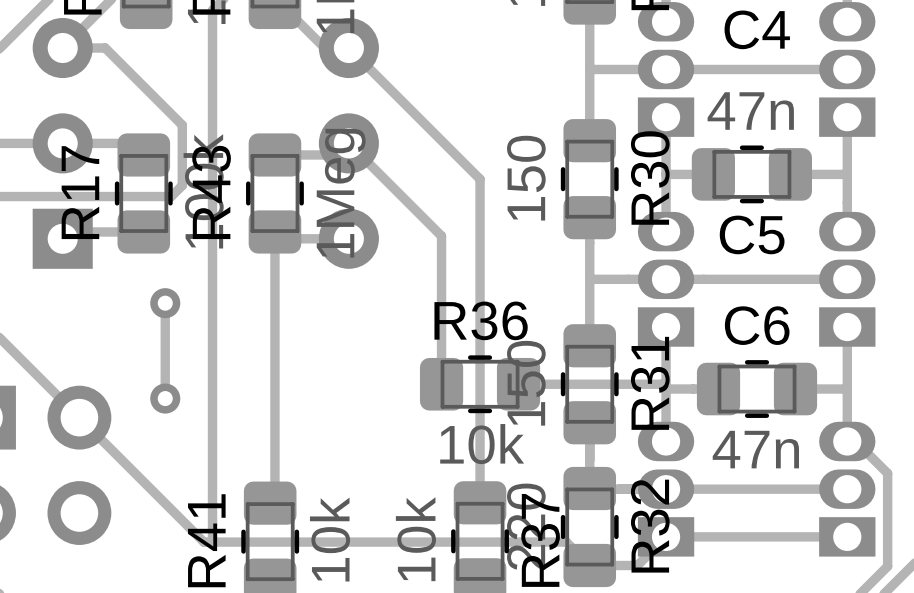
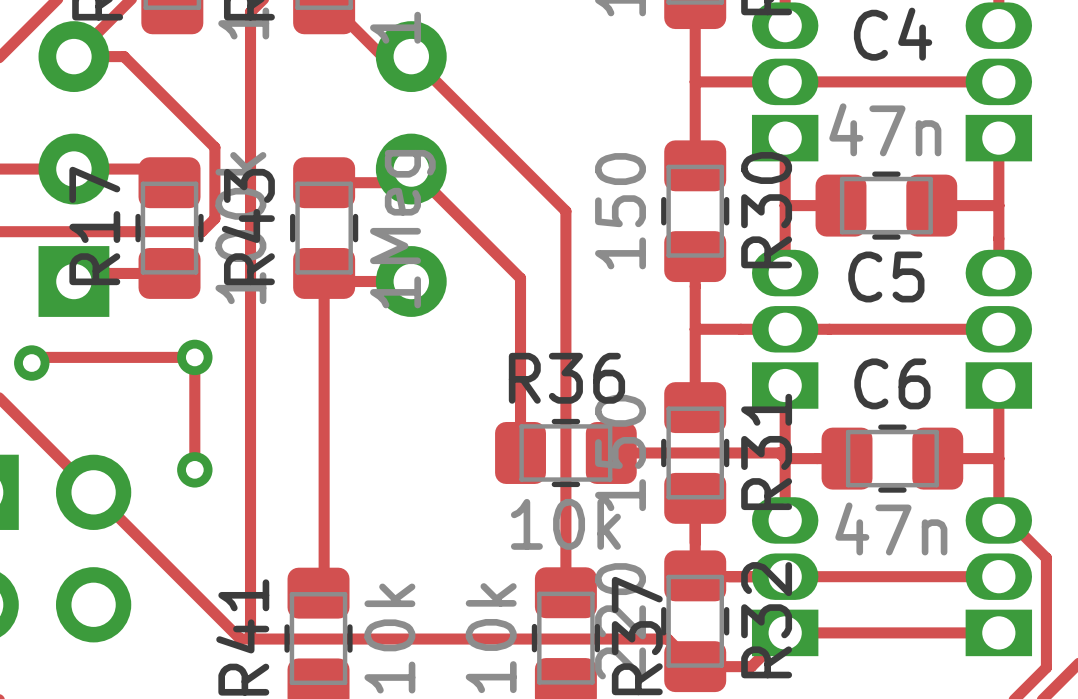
track: none -> (194, 357) (37, 357) (31, 363)
via: none -> (31, 363)

